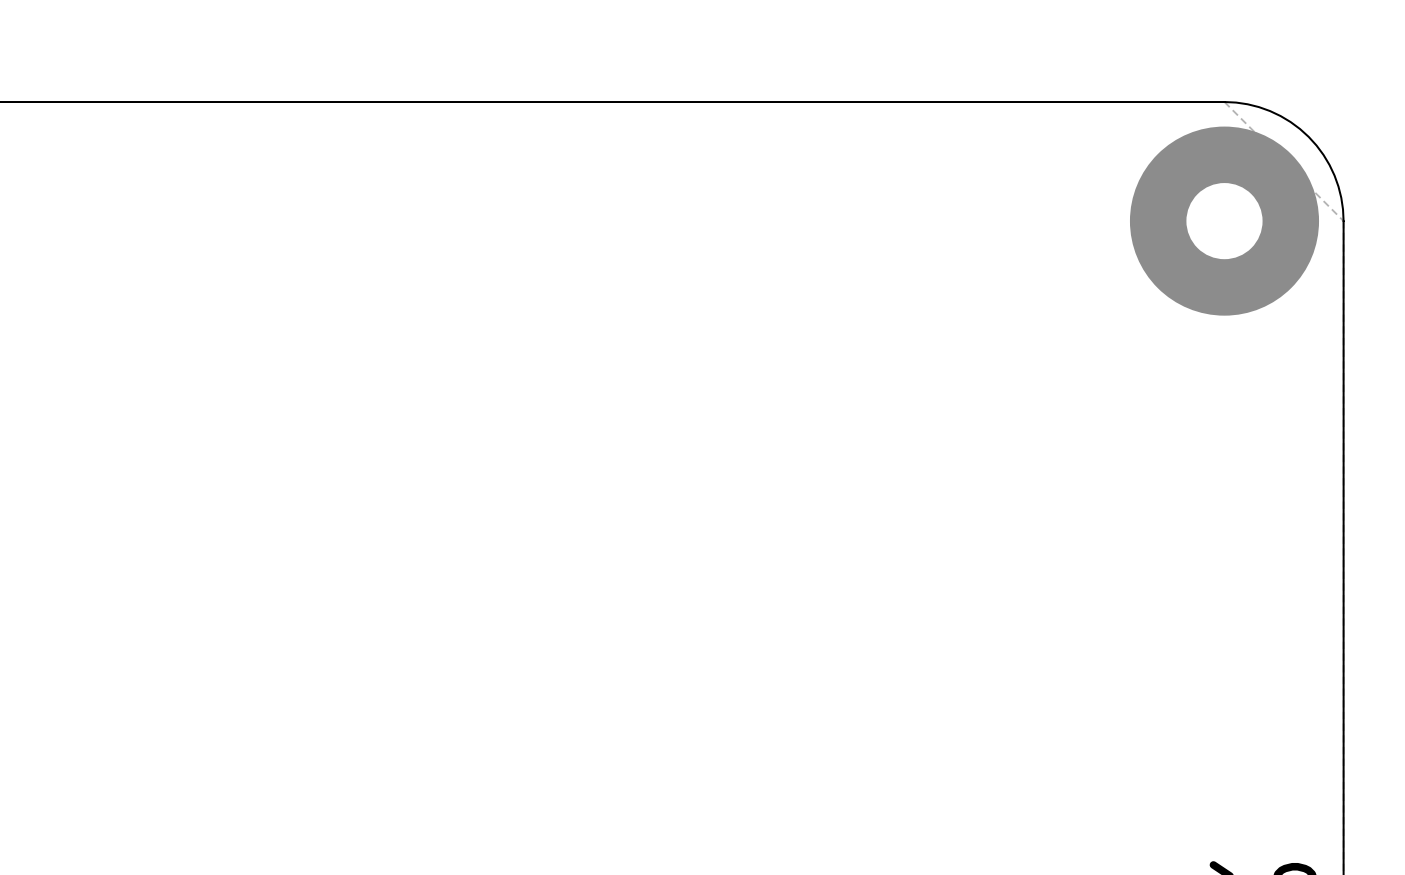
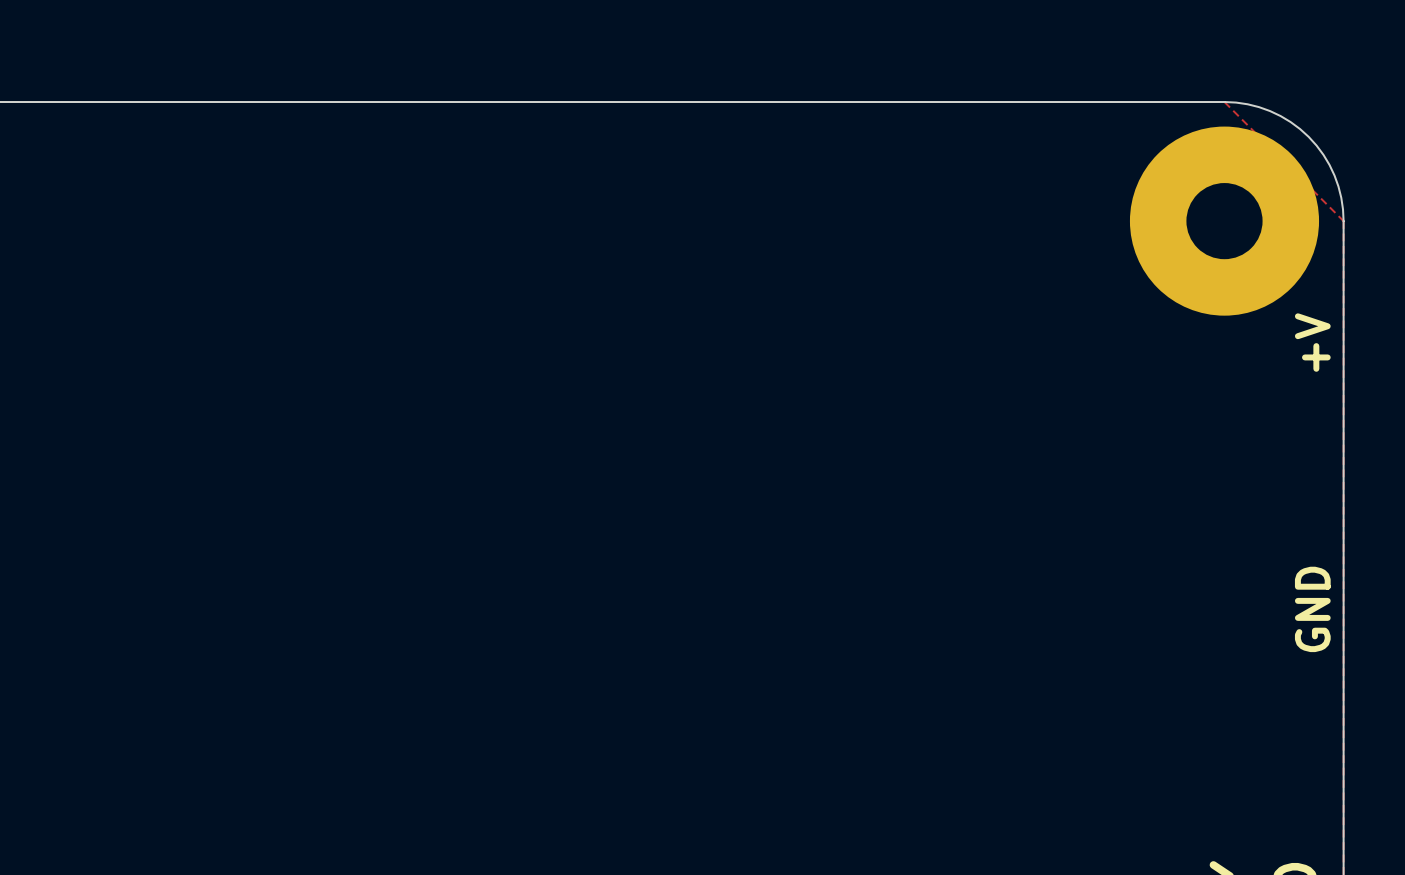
text: none -> +V (1312, 342)
text: none -> GND (1312, 609)

